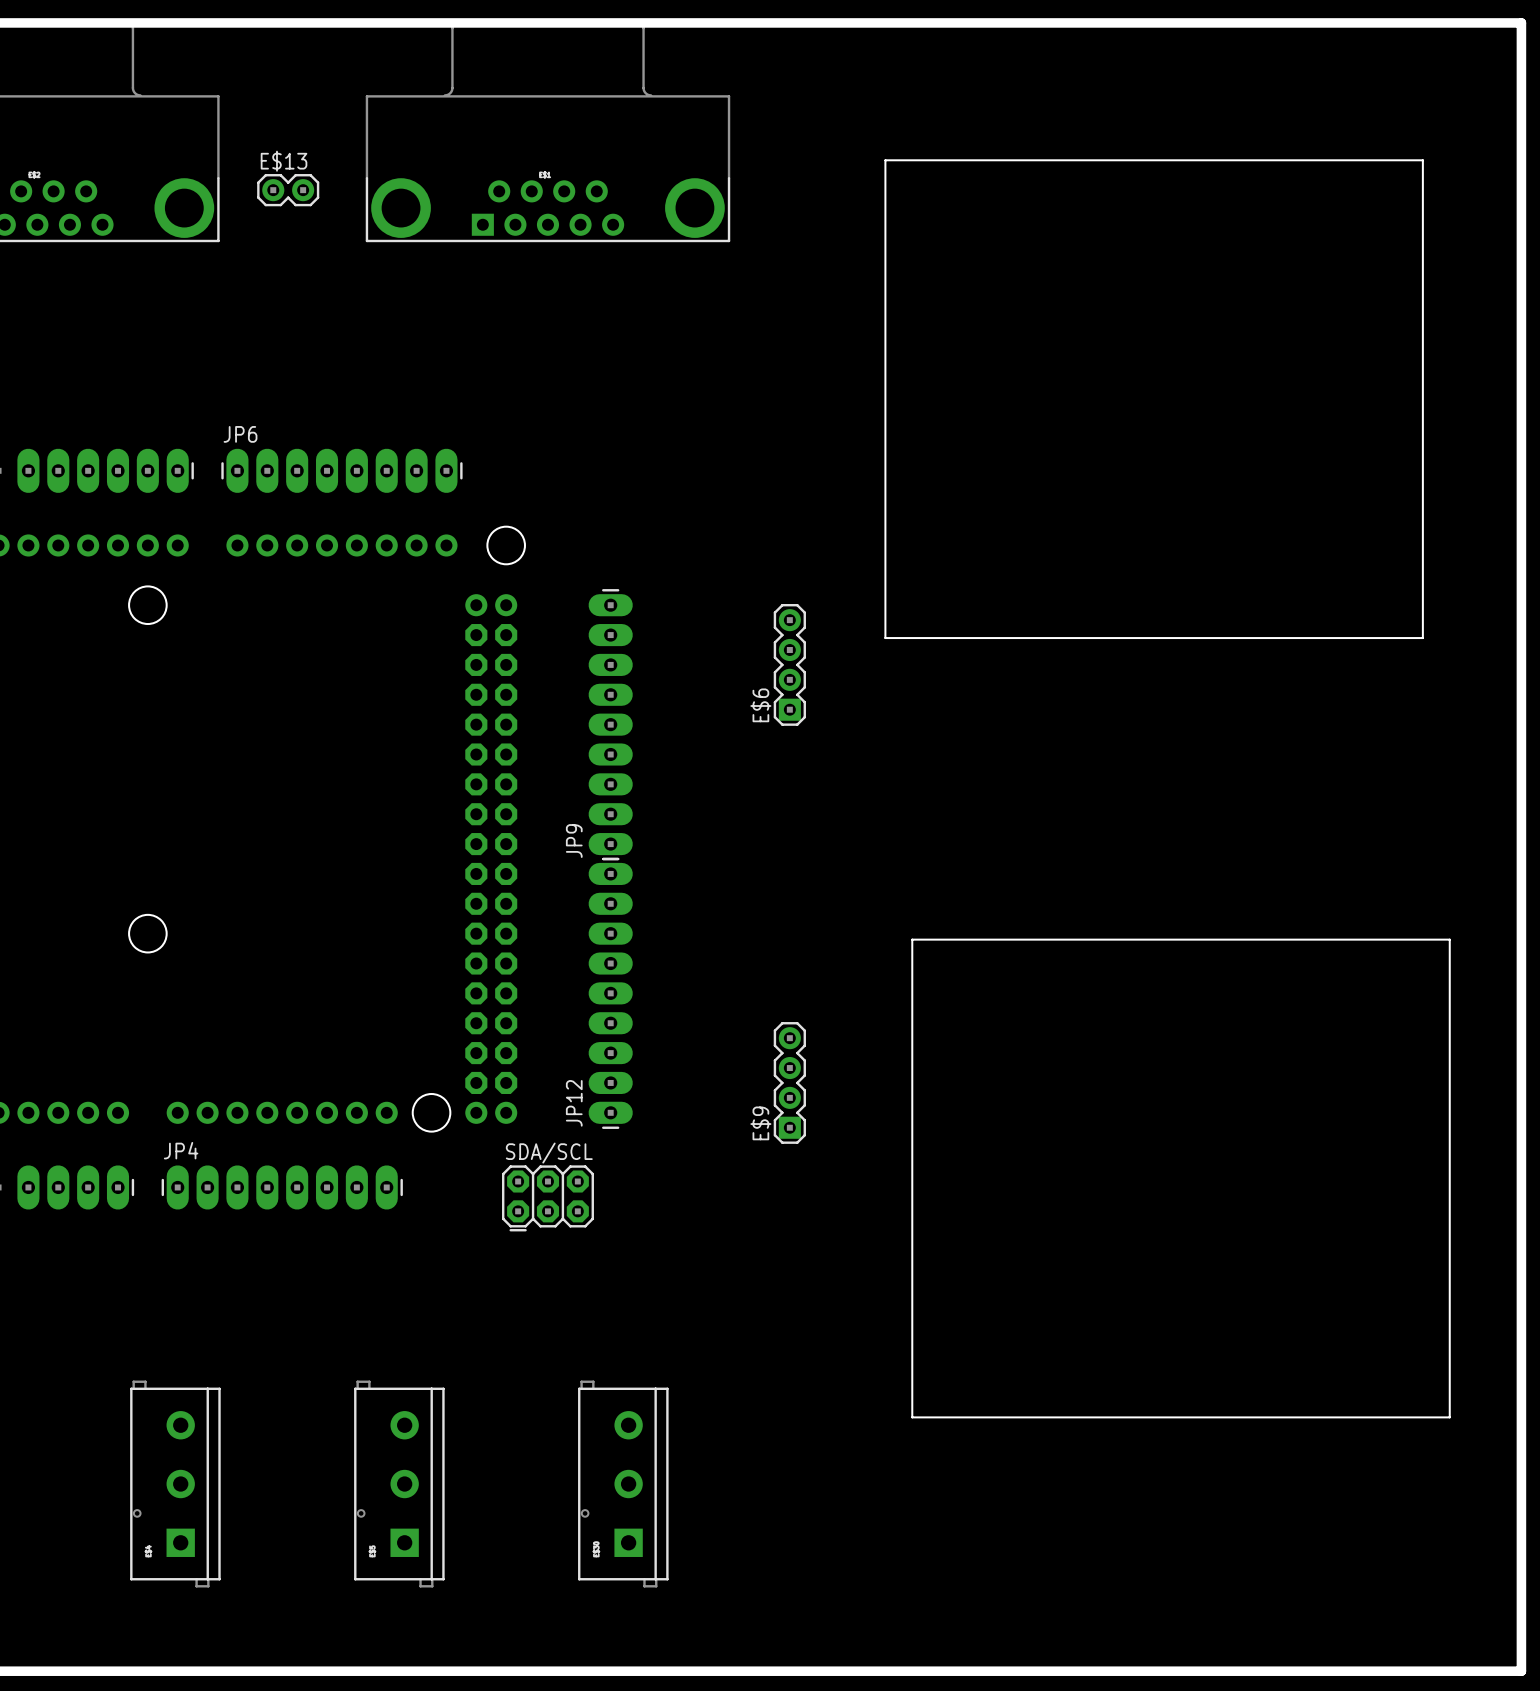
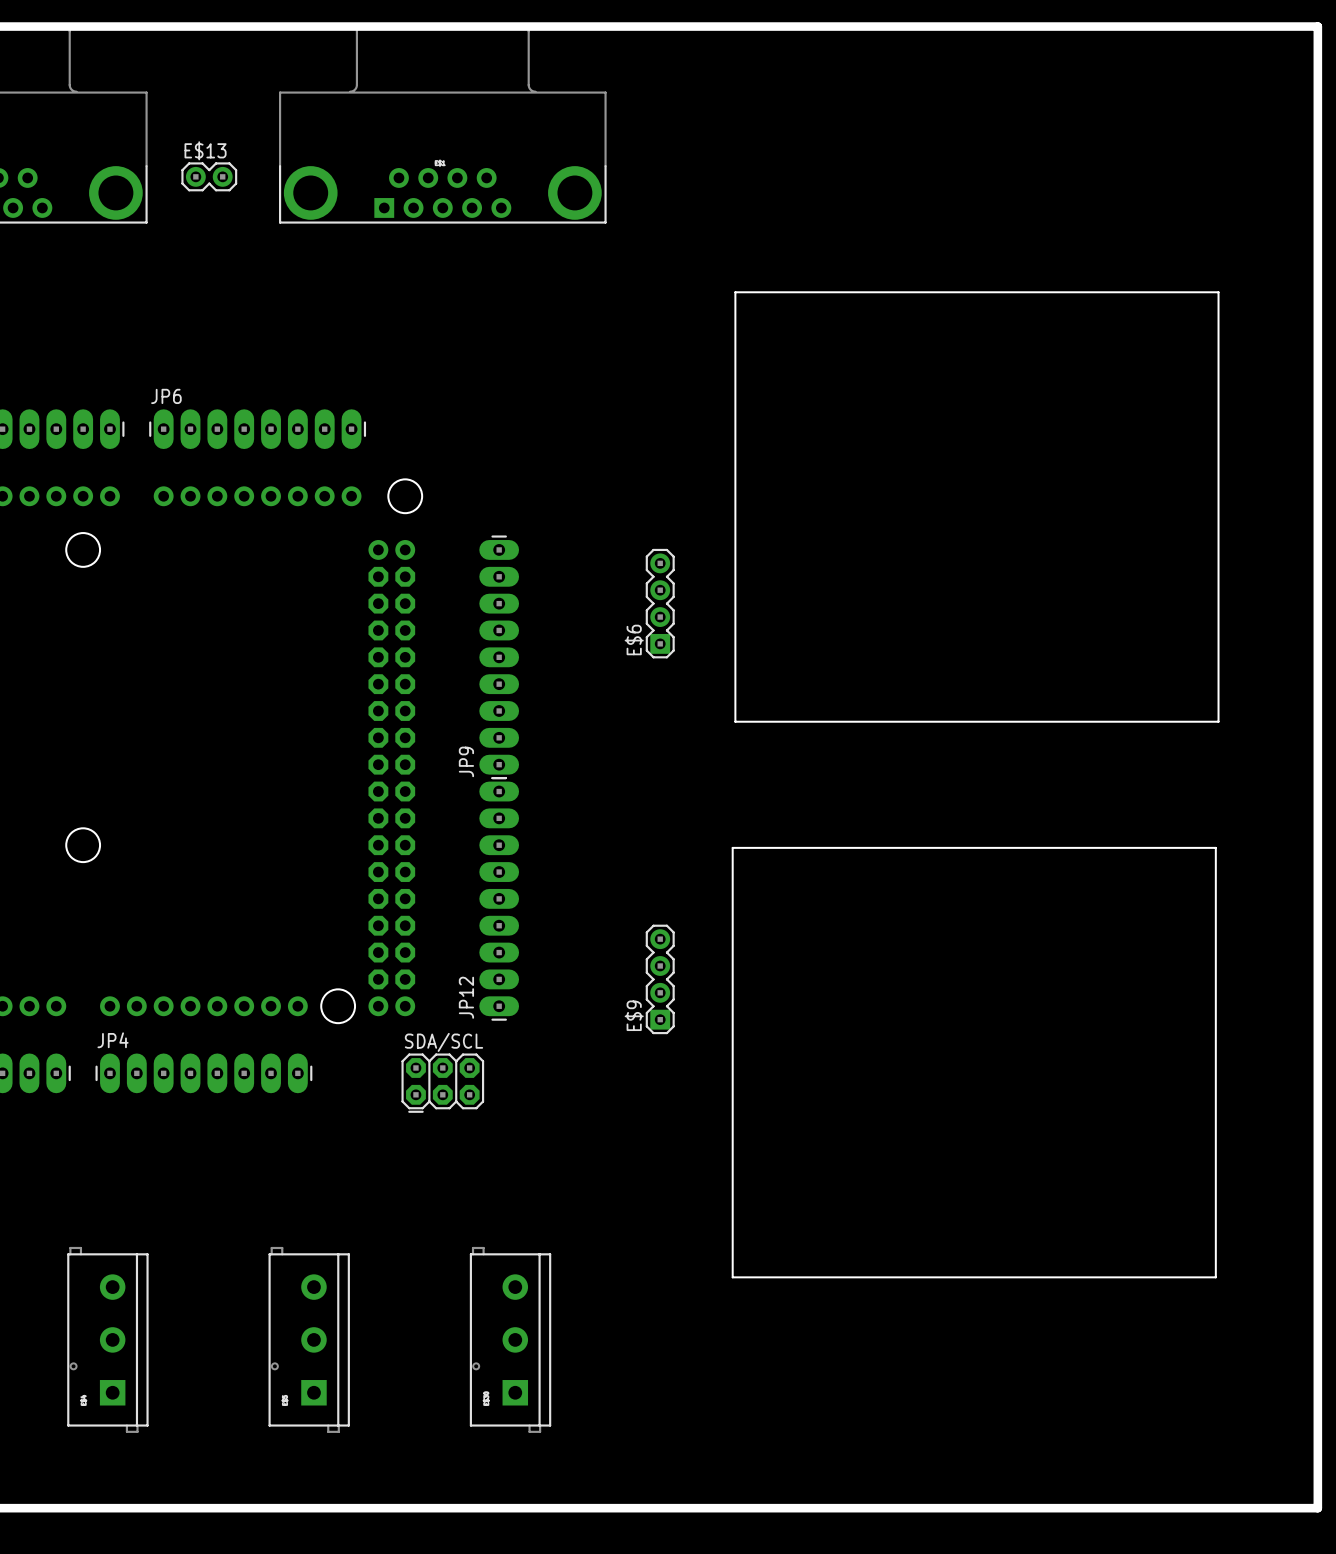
board edge: (885, 160) (1422, 160) (1422, 638) (885, 638) (885, 160) -> (735, 292) (1218, 292) (1218, 721) (735, 721) (735, 292)
board edge: (912, 939) (1449, 939) (1449, 1417) (912, 1417) (912, 939) -> (732, 847) (732, 1277) (1215, 1277) (1215, 847) (732, 847)

